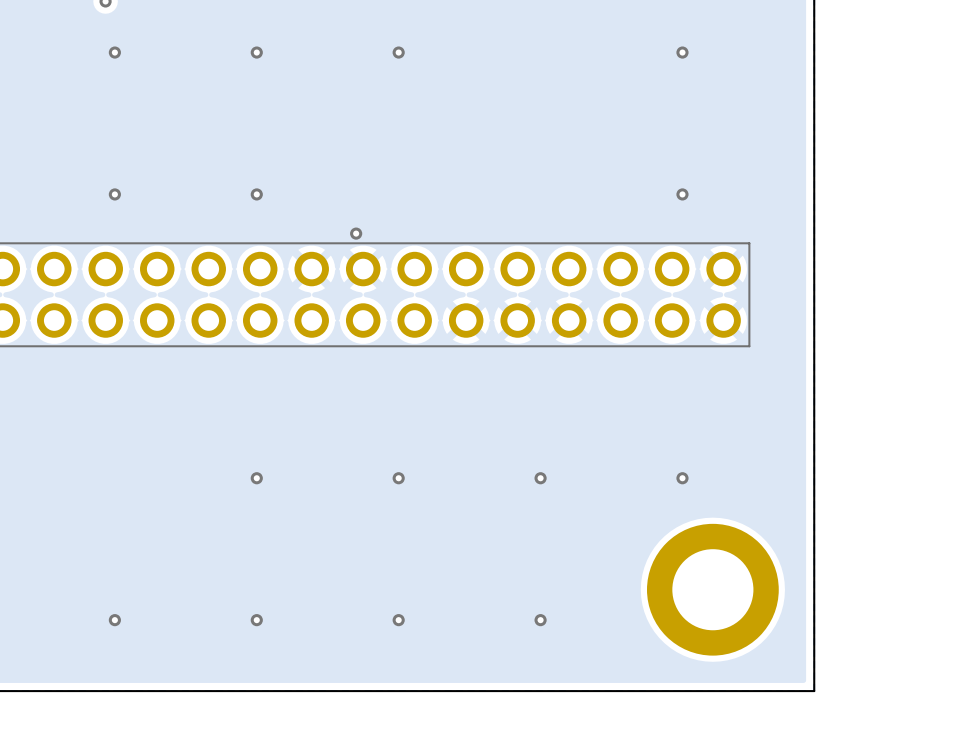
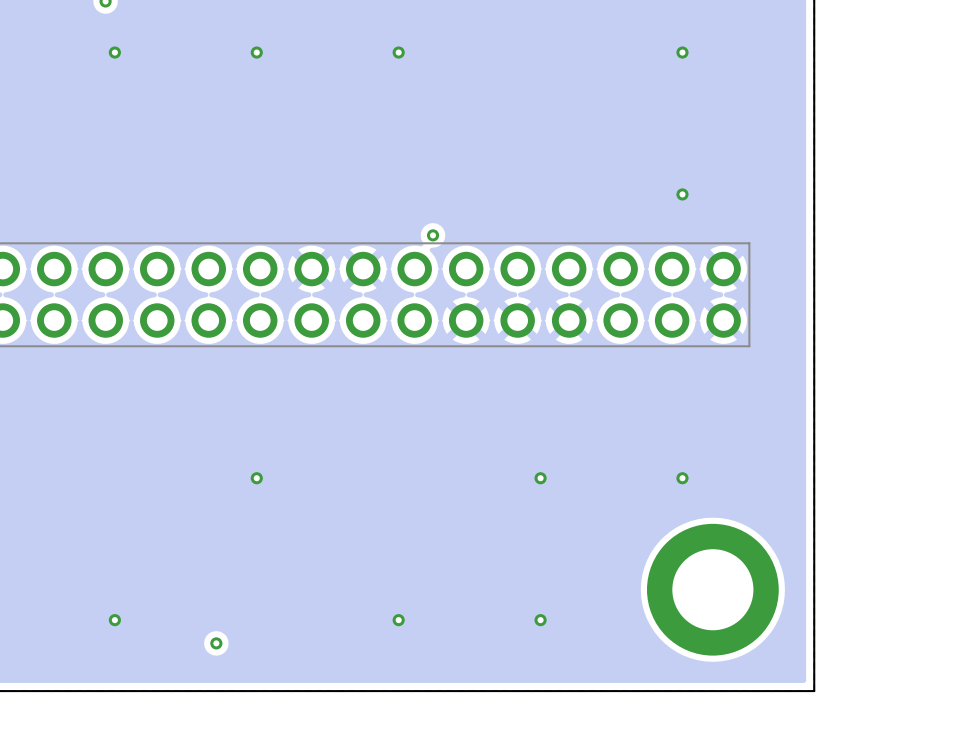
via: (114, 194) -> none
via: (256, 194) -> none
via position: (356, 233) -> (433, 235)
via: (398, 478) -> none
via position: (256, 620) -> (216, 643)

